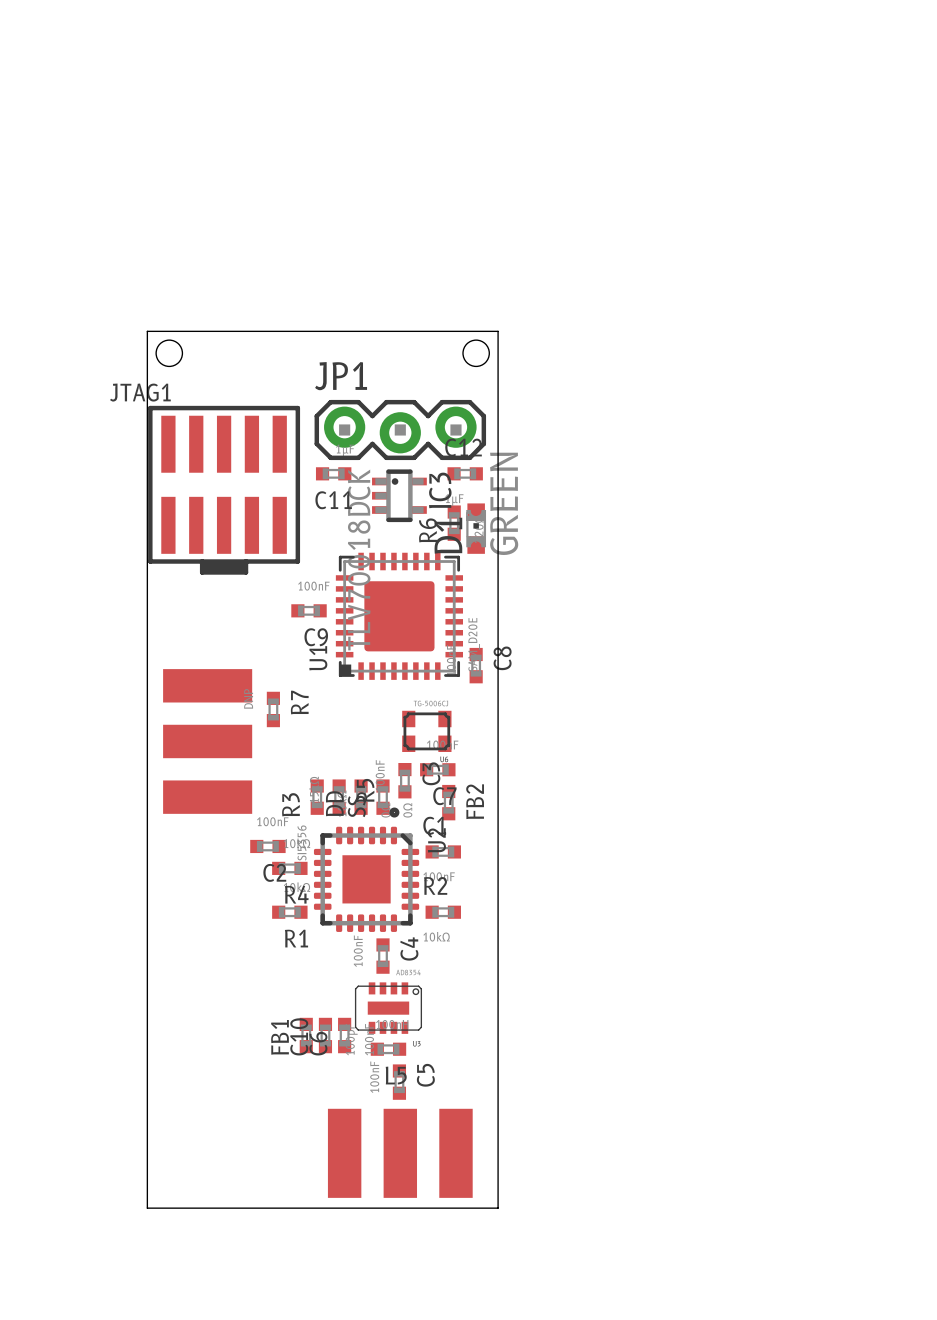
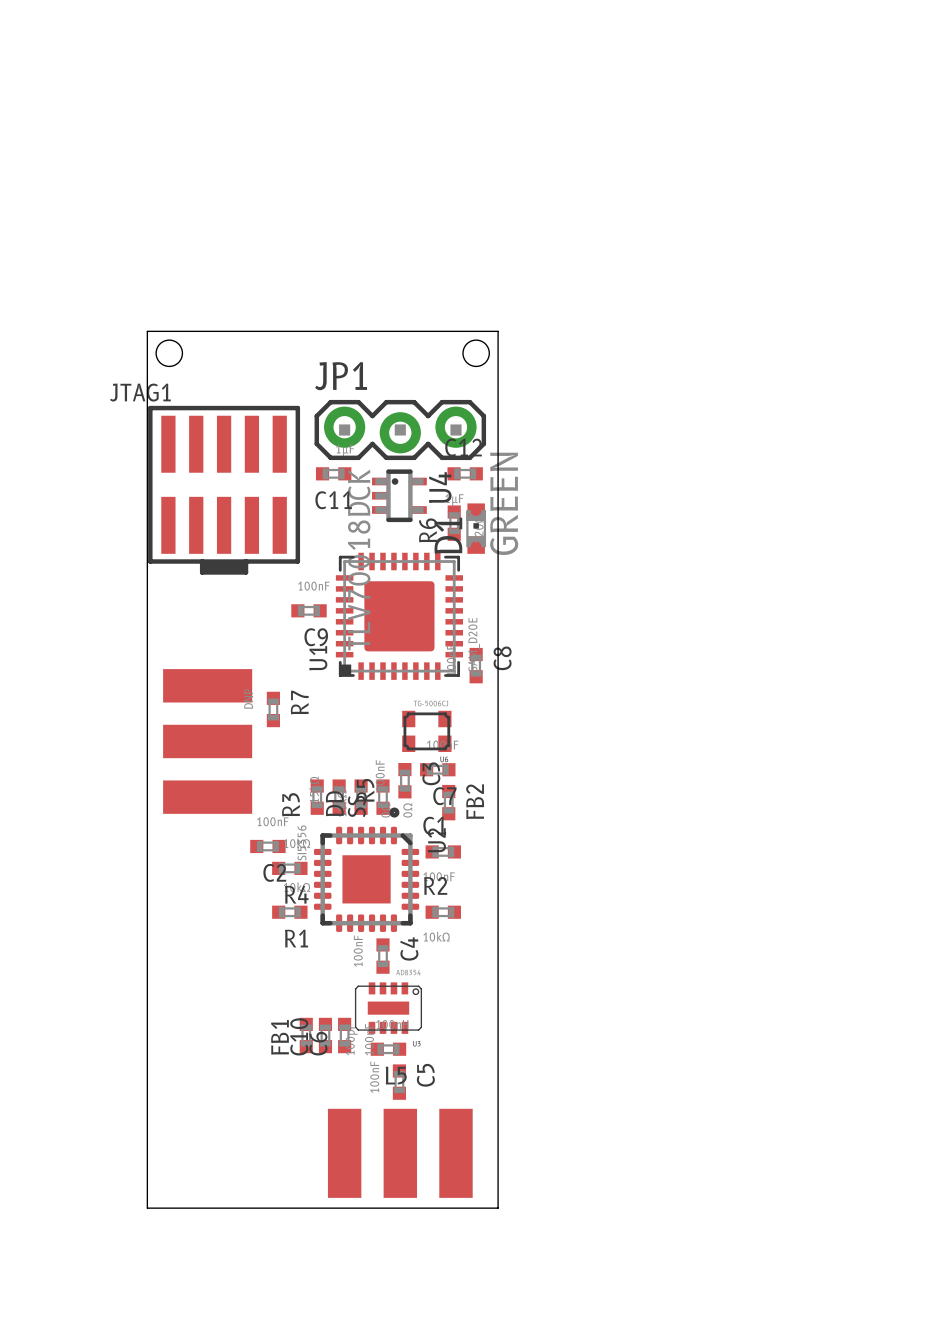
IC3 name: IC3 (440, 490) -> U4 (440, 487)

